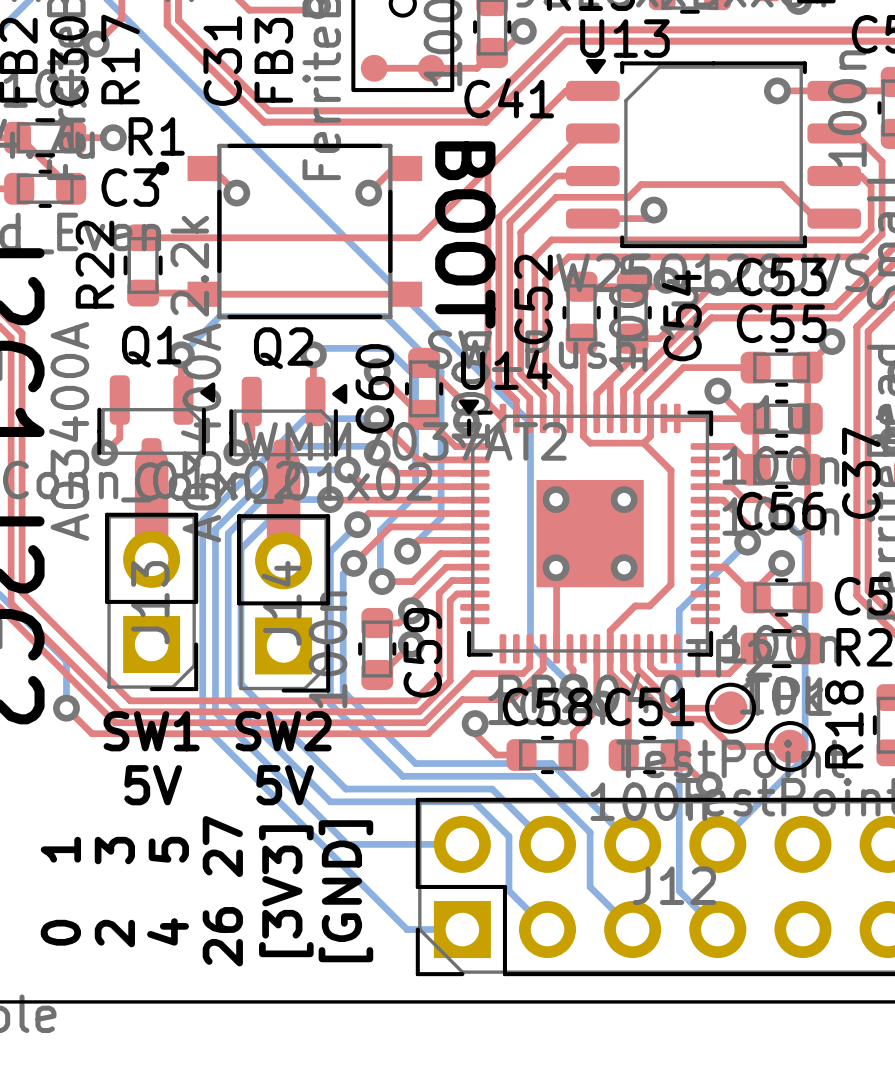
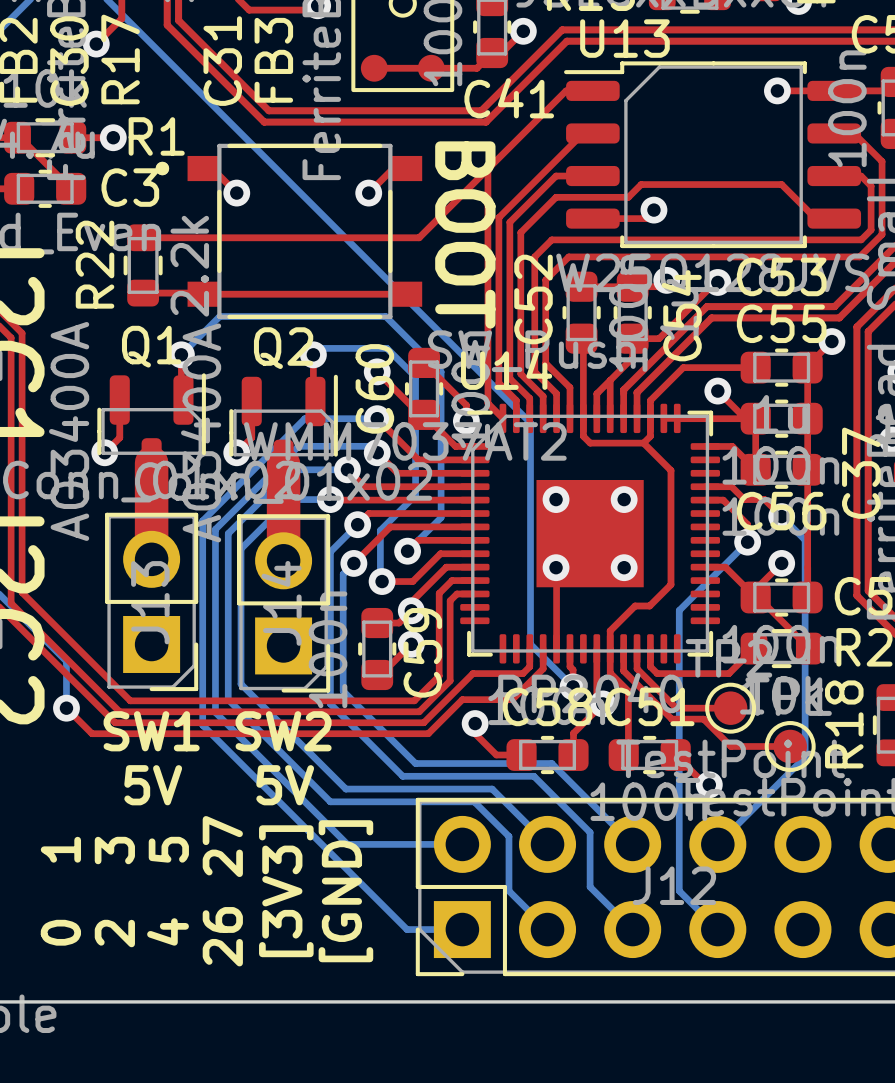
U13 footprint: [566, 59, 862, 249] -> [564, 61, 862, 249]
Q1 footprint: [97, 375, 216, 488] -> [97, 373, 206, 488]
Q2 footprint: [229, 376, 348, 490] -> [229, 374, 338, 490]
U14 footprint: [459, 399, 720, 664] -> [460, 403, 720, 664]

